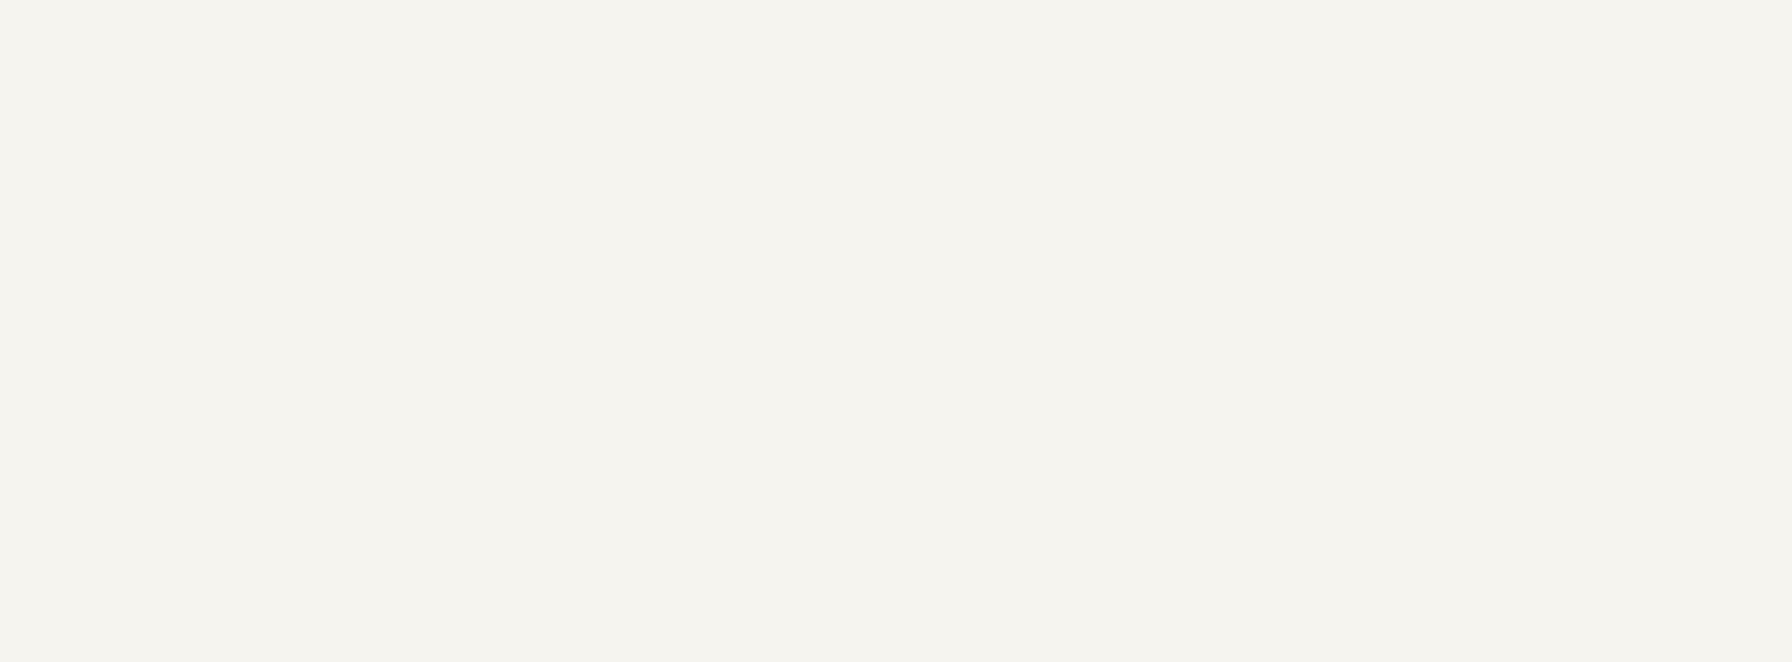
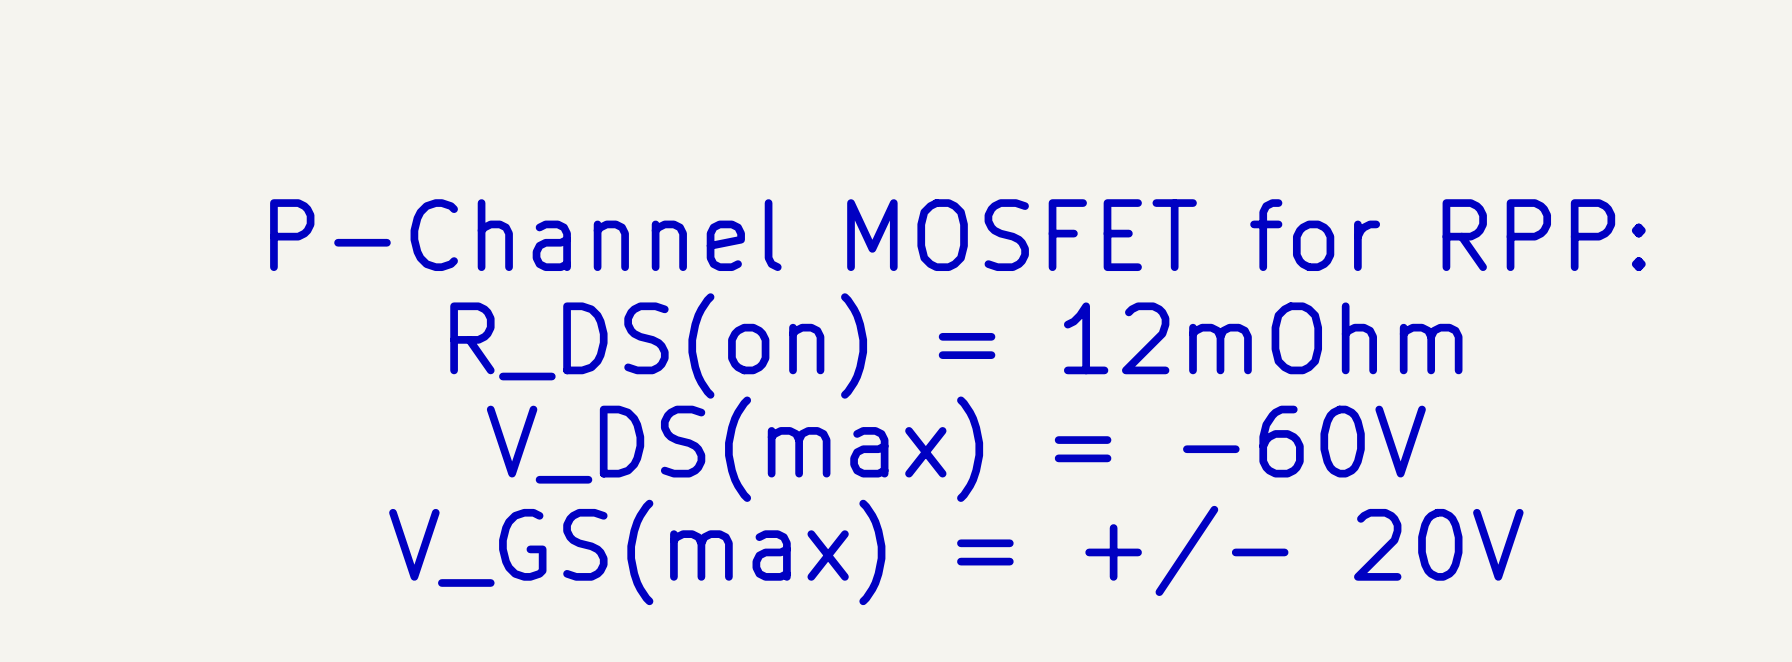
text: none -> P-Channel MOSFET for RPP: (957, 235)
text: none -> R_DS(on) = 12mOhm (956, 345)
text: none -> V_DS(max) = -60V (956, 449)
text: none -> V_GS(max) = +/- 20V (956, 552)

